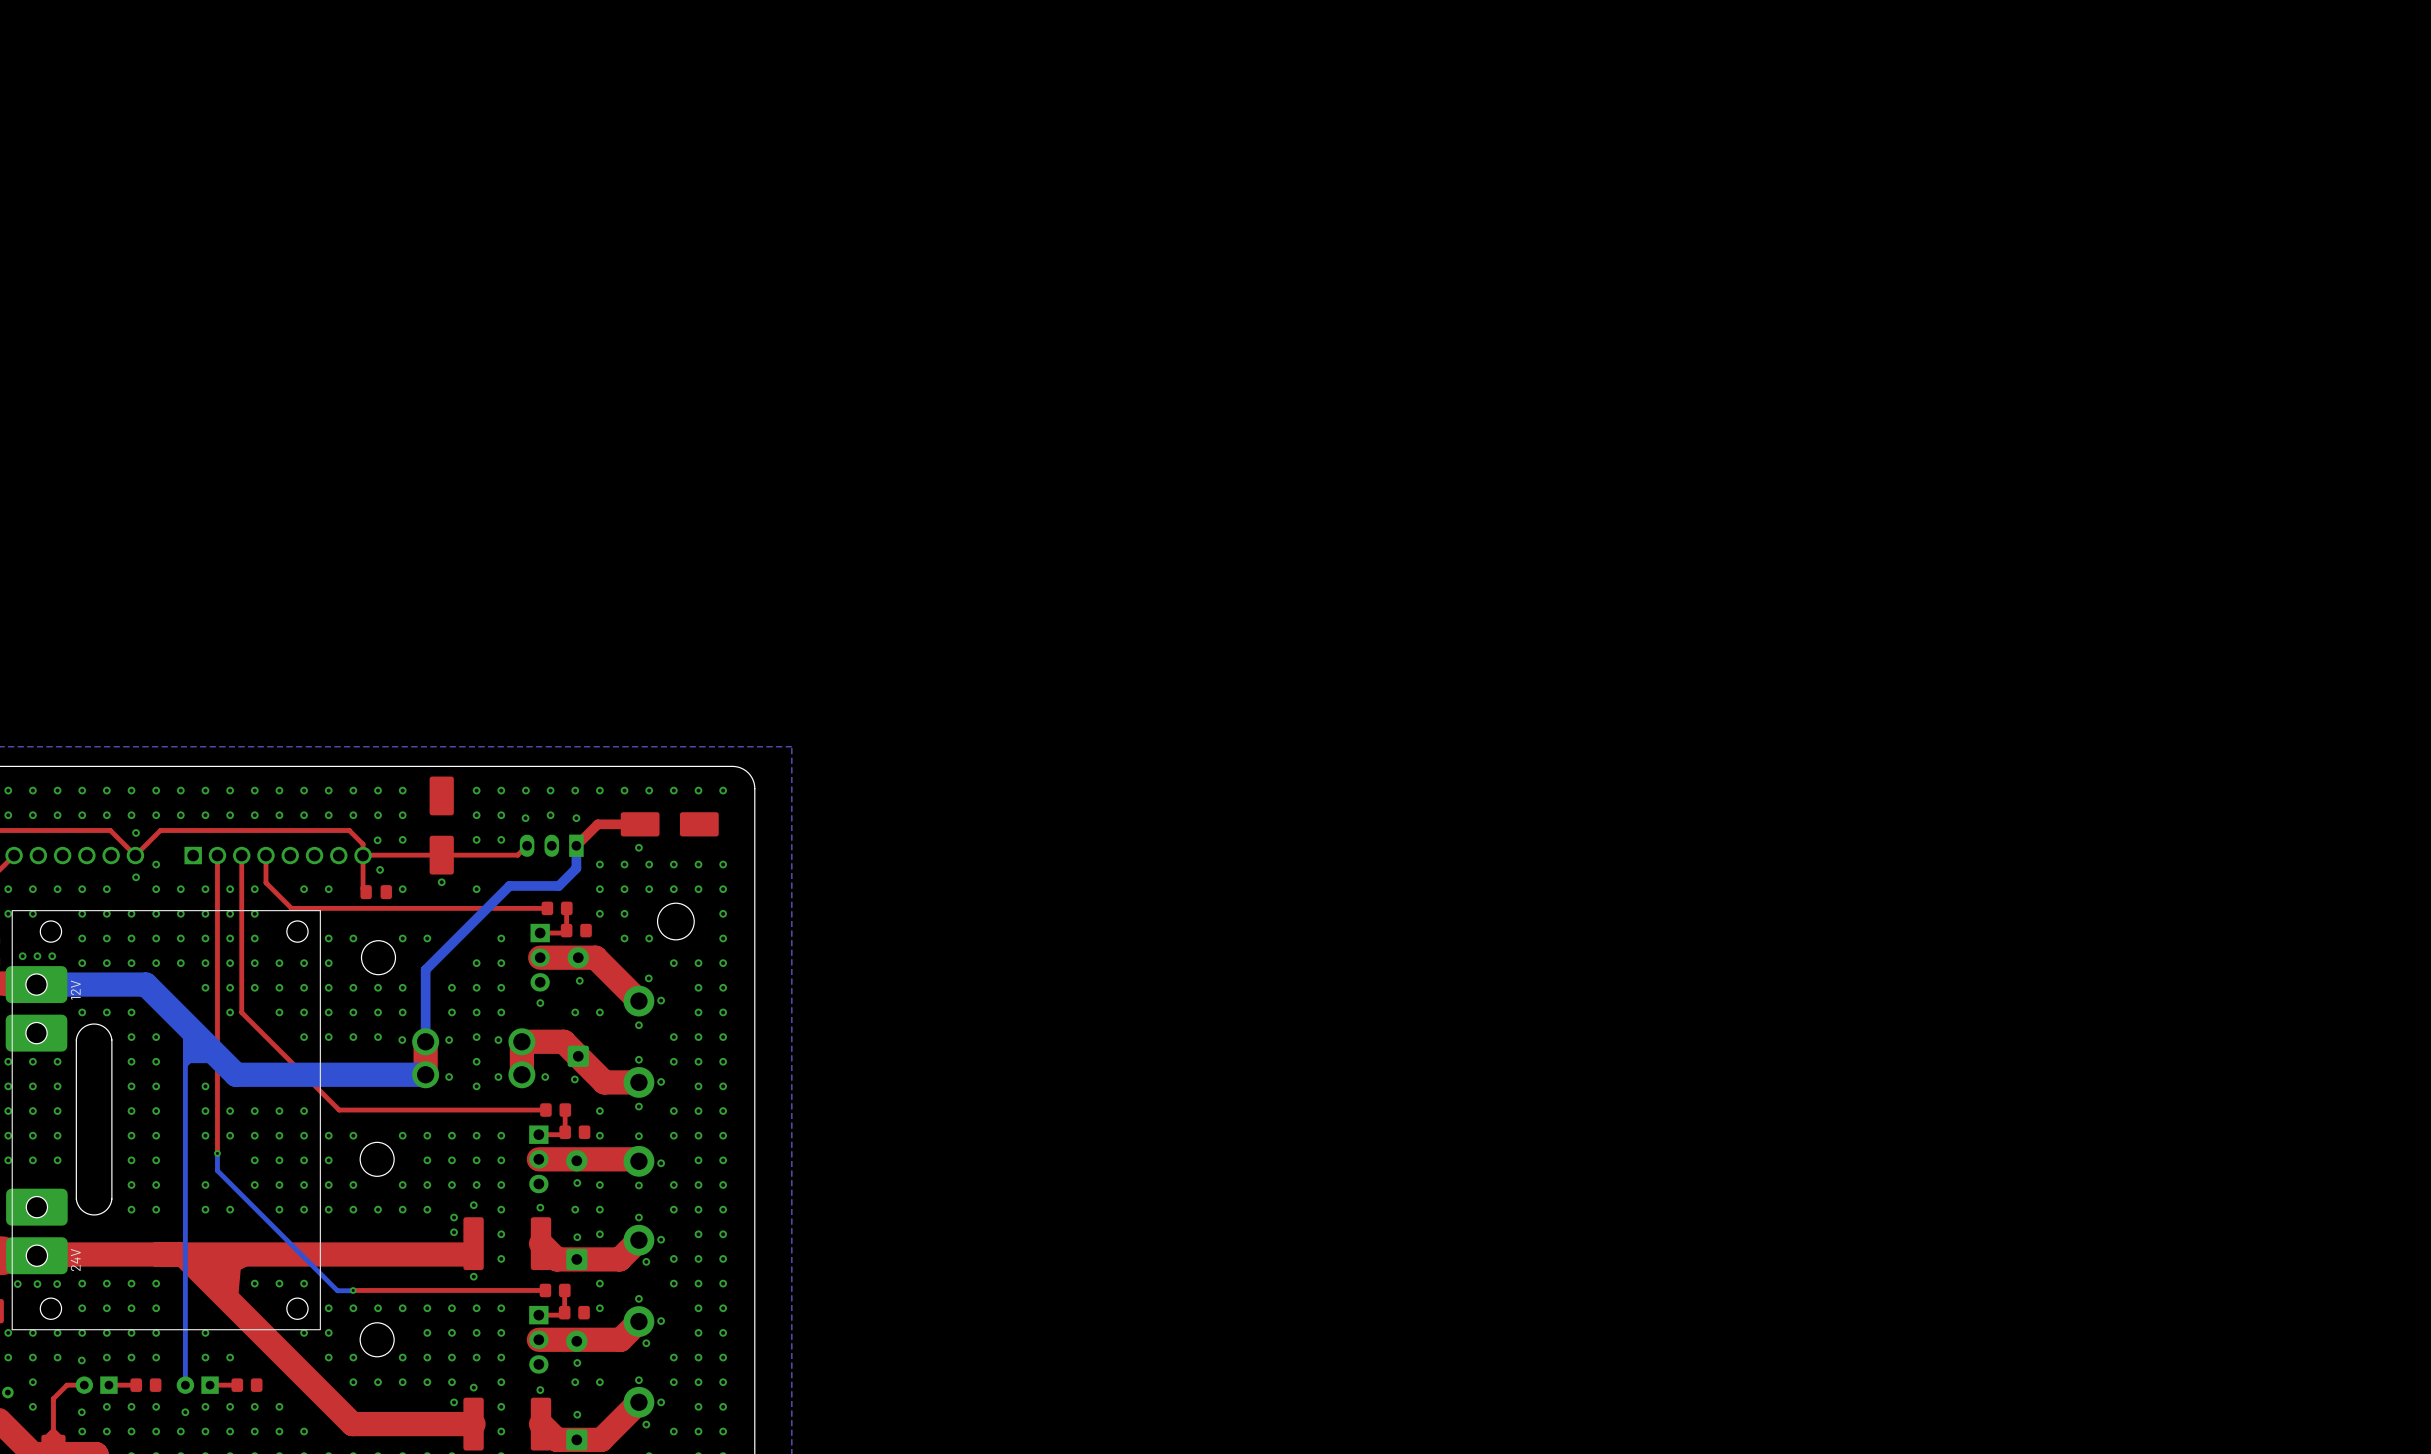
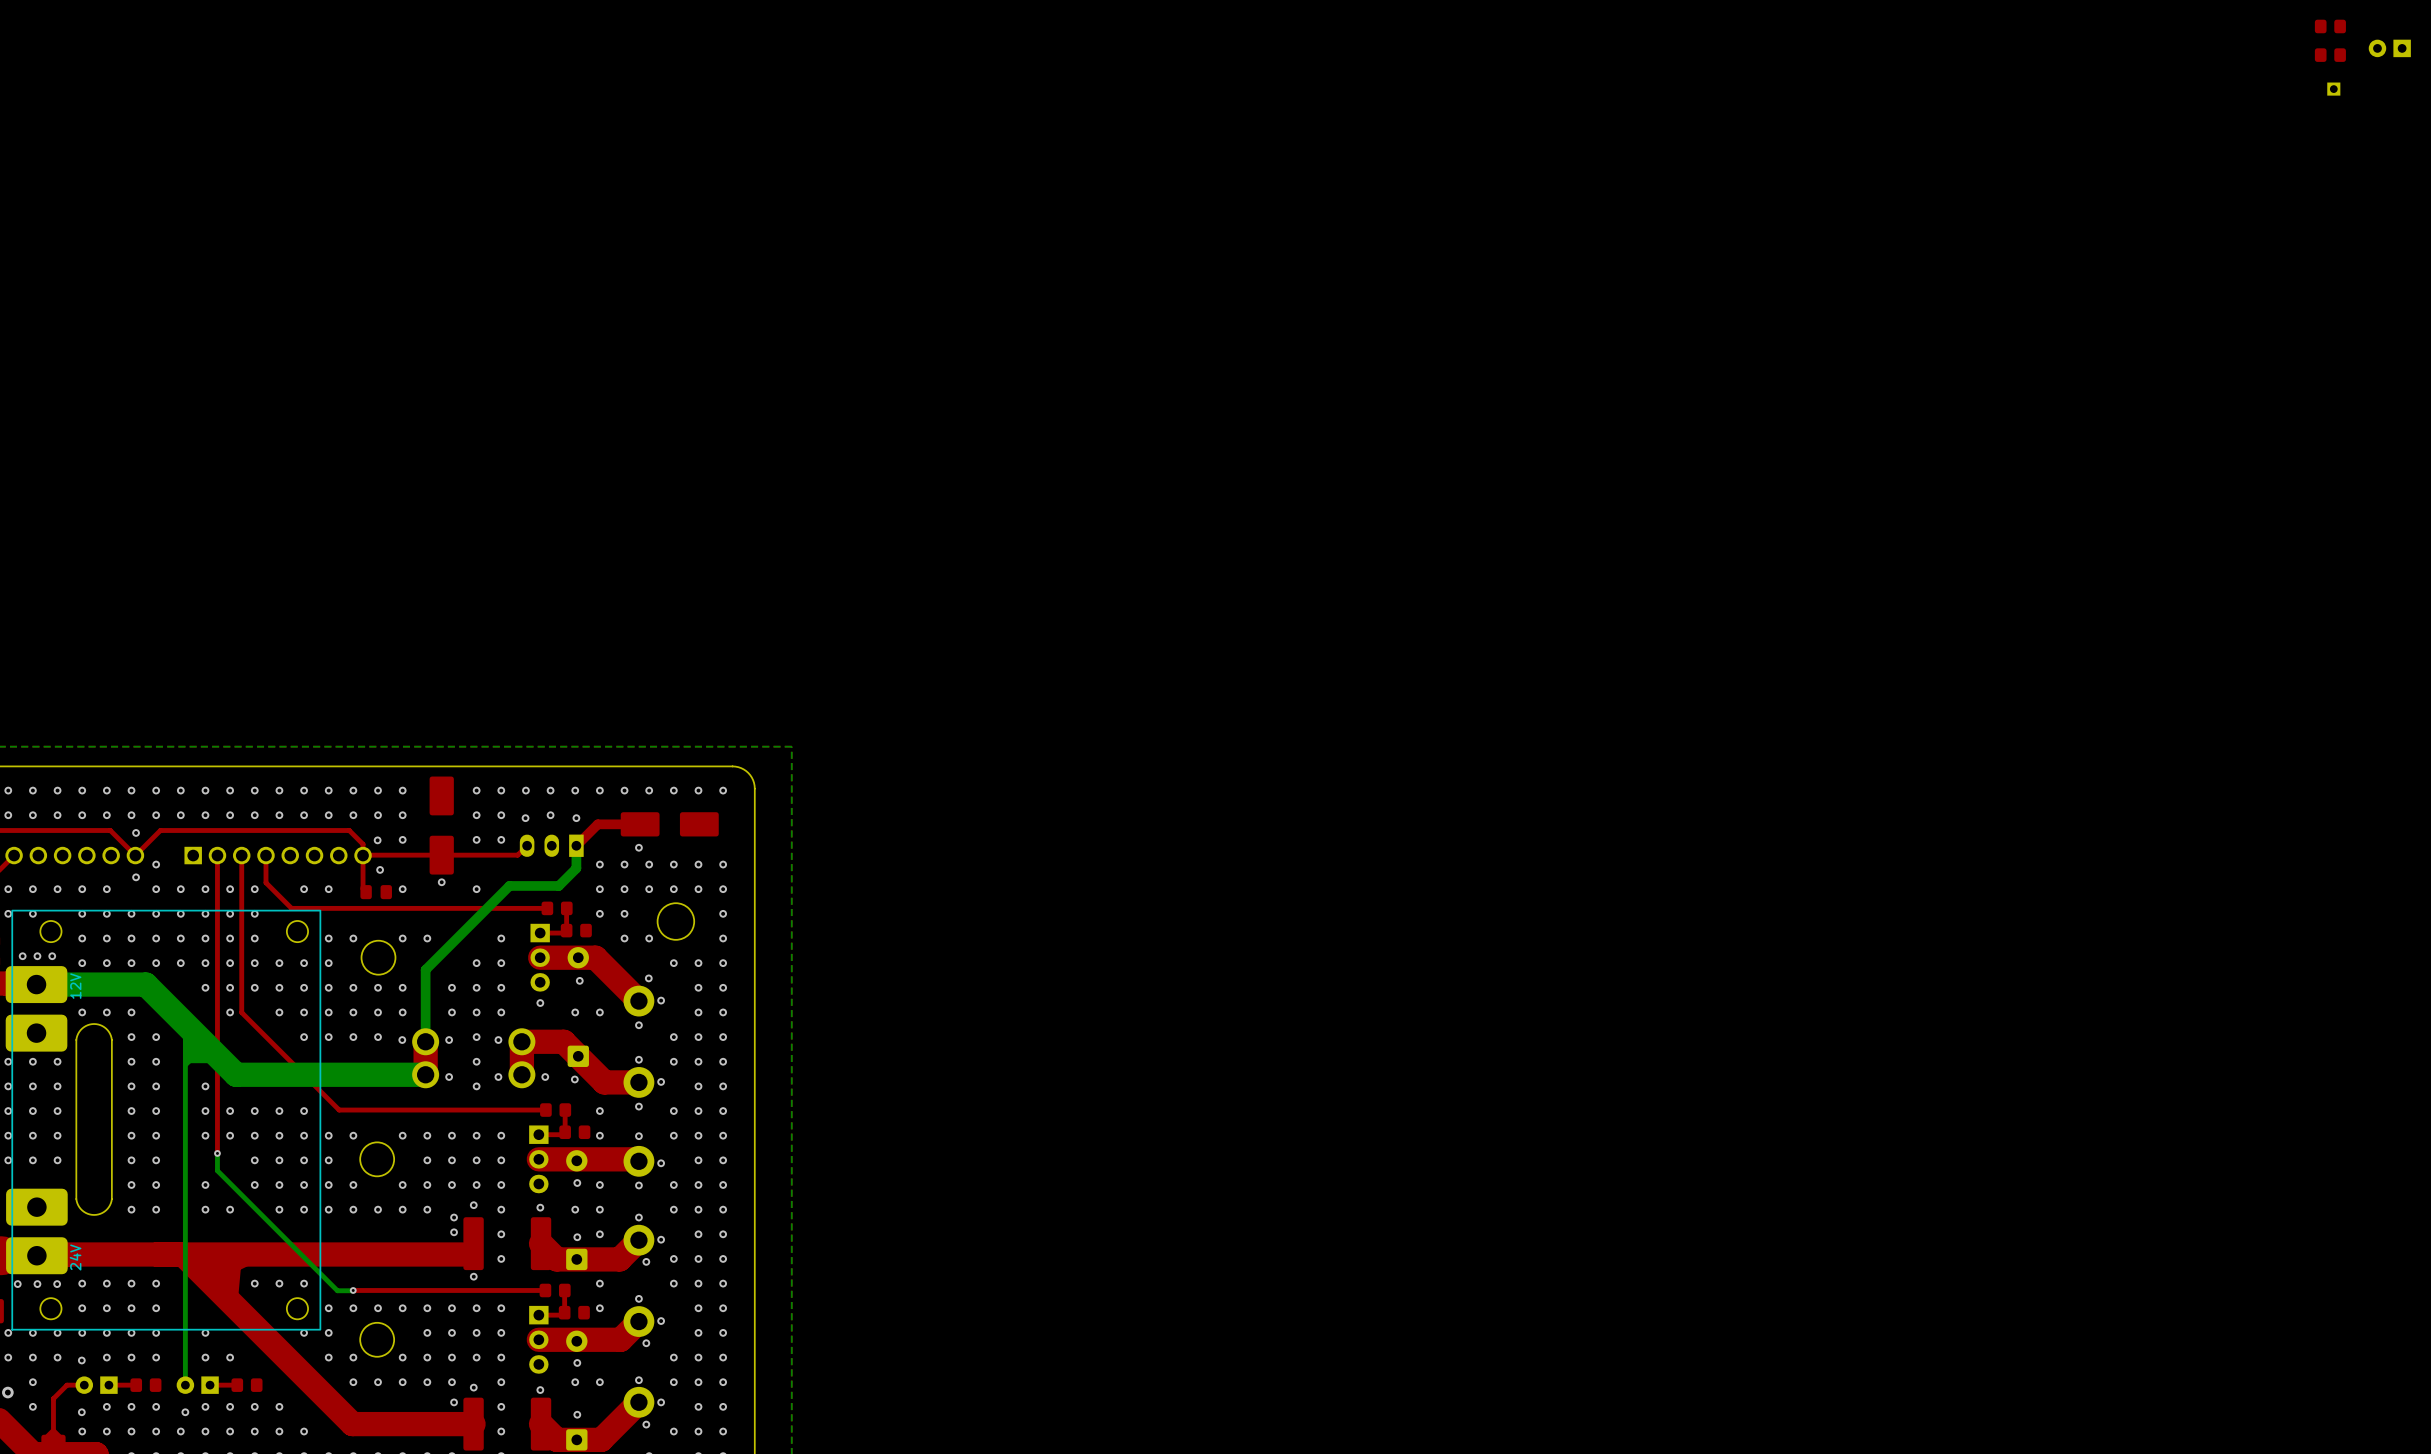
part: none -> (2330, 26)
part: none -> (2389, 48)
part: none -> (2330, 55)
part: none -> (2333, 89)

